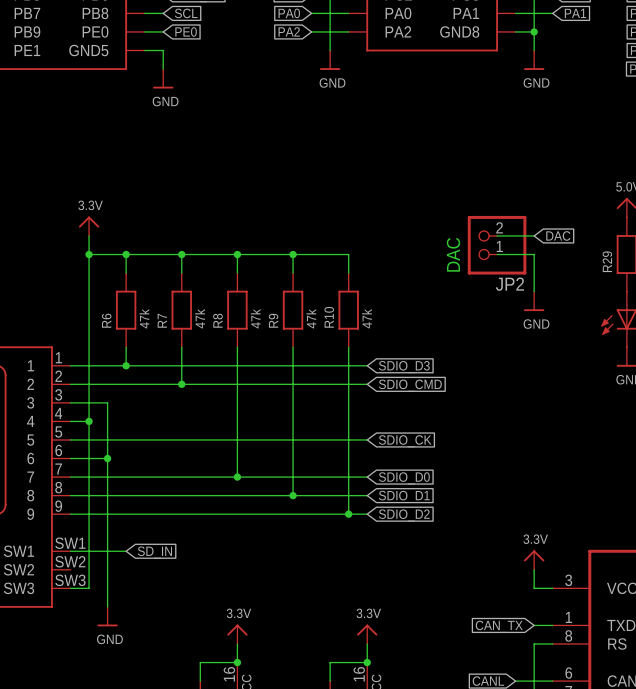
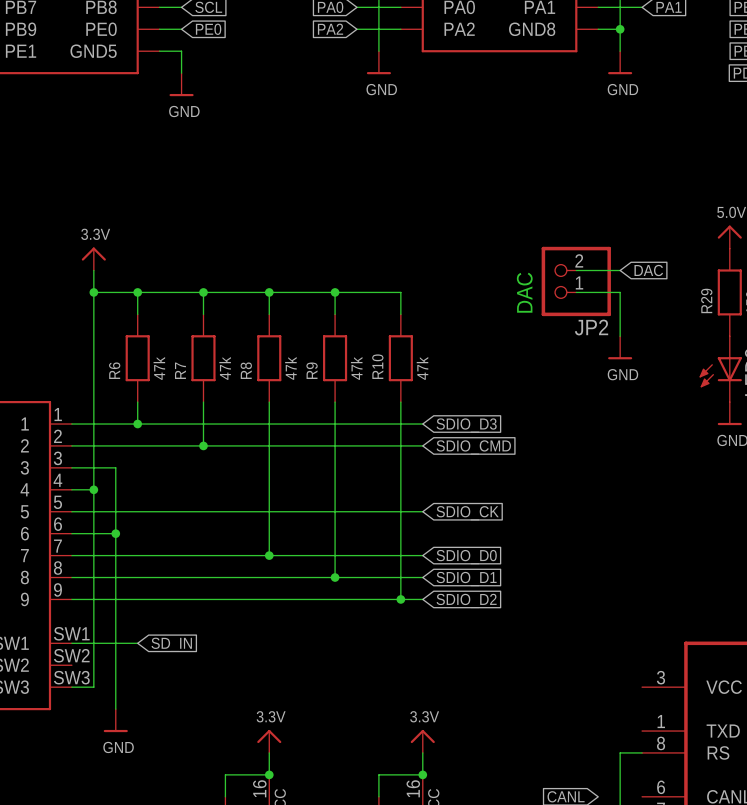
power symbol: 3.3V (534, 560) -> none
wire: (534, 569) (534, 588) (552, 588) -> none
wire: (534, 625) (552, 625) -> none
global label: CAN_TX (499, 626) -> none
wire: (515, 681) (552, 681) -> none

